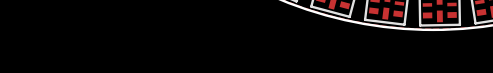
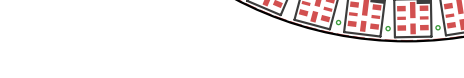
via: none -> (338, 22)
via: none -> (438, 27)
via: none -> (388, 28)

